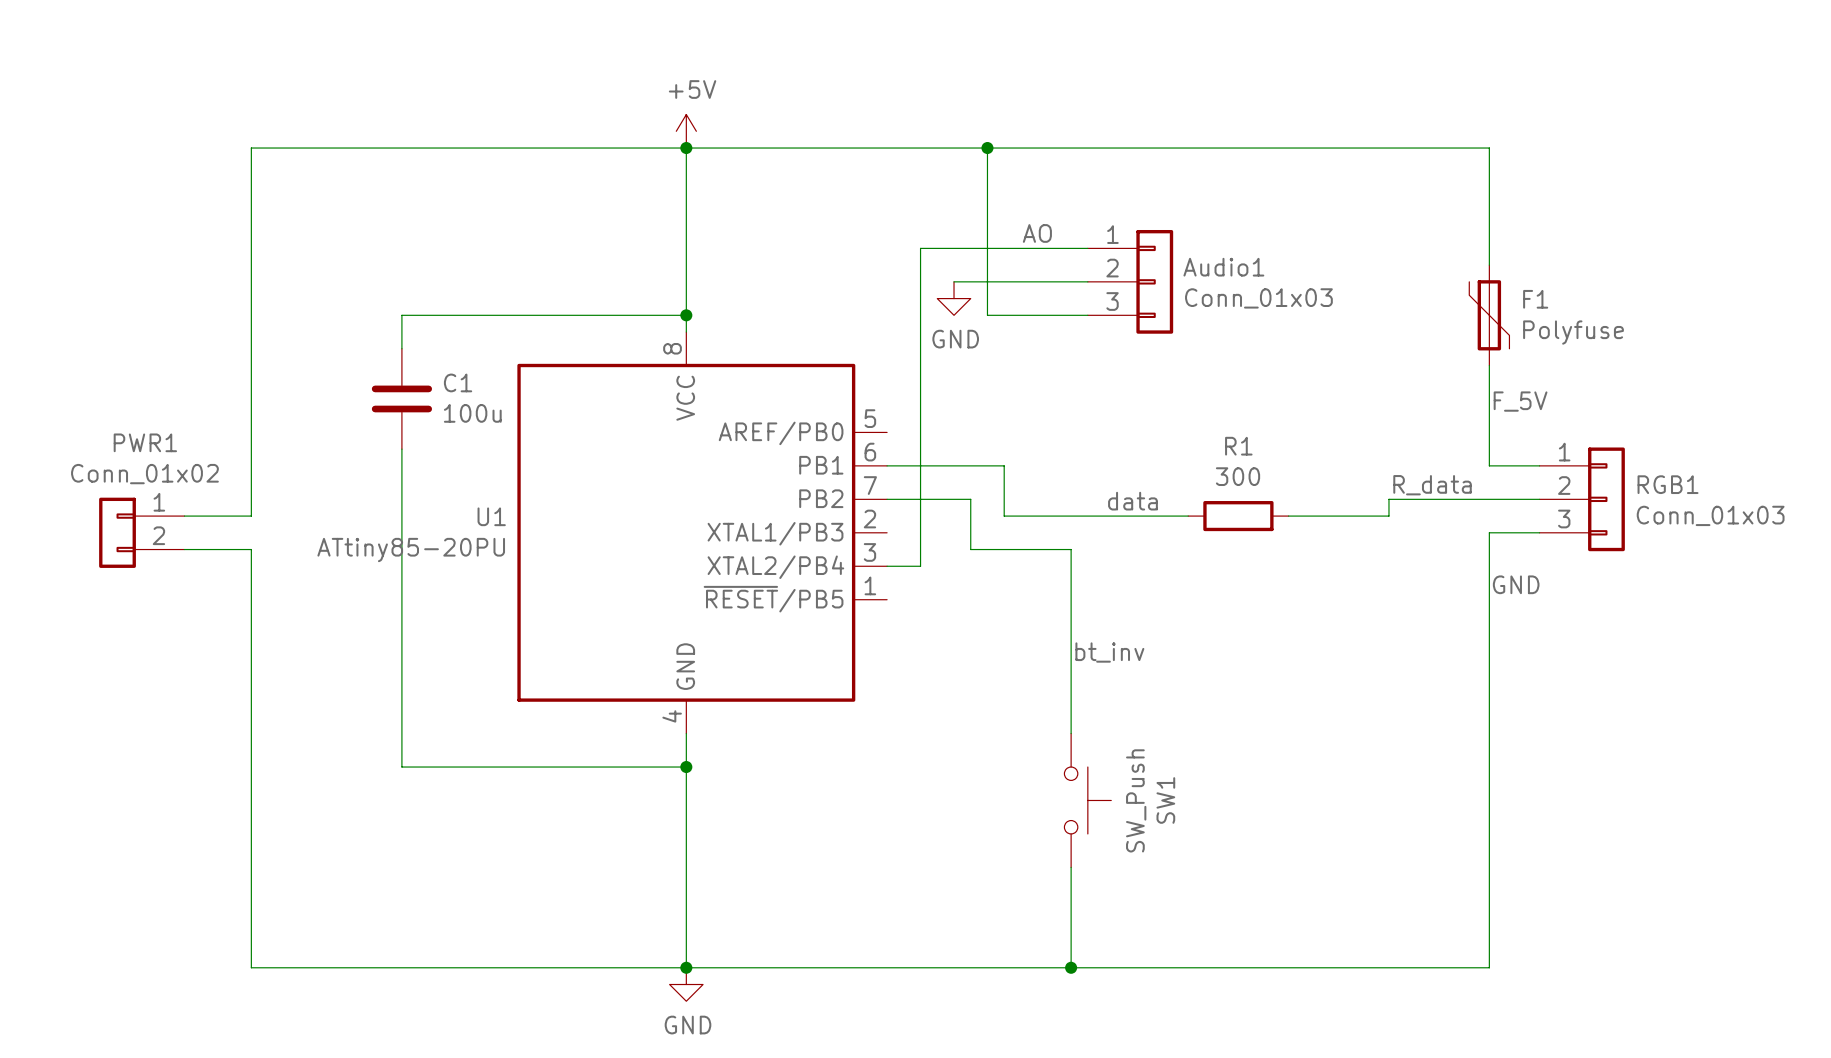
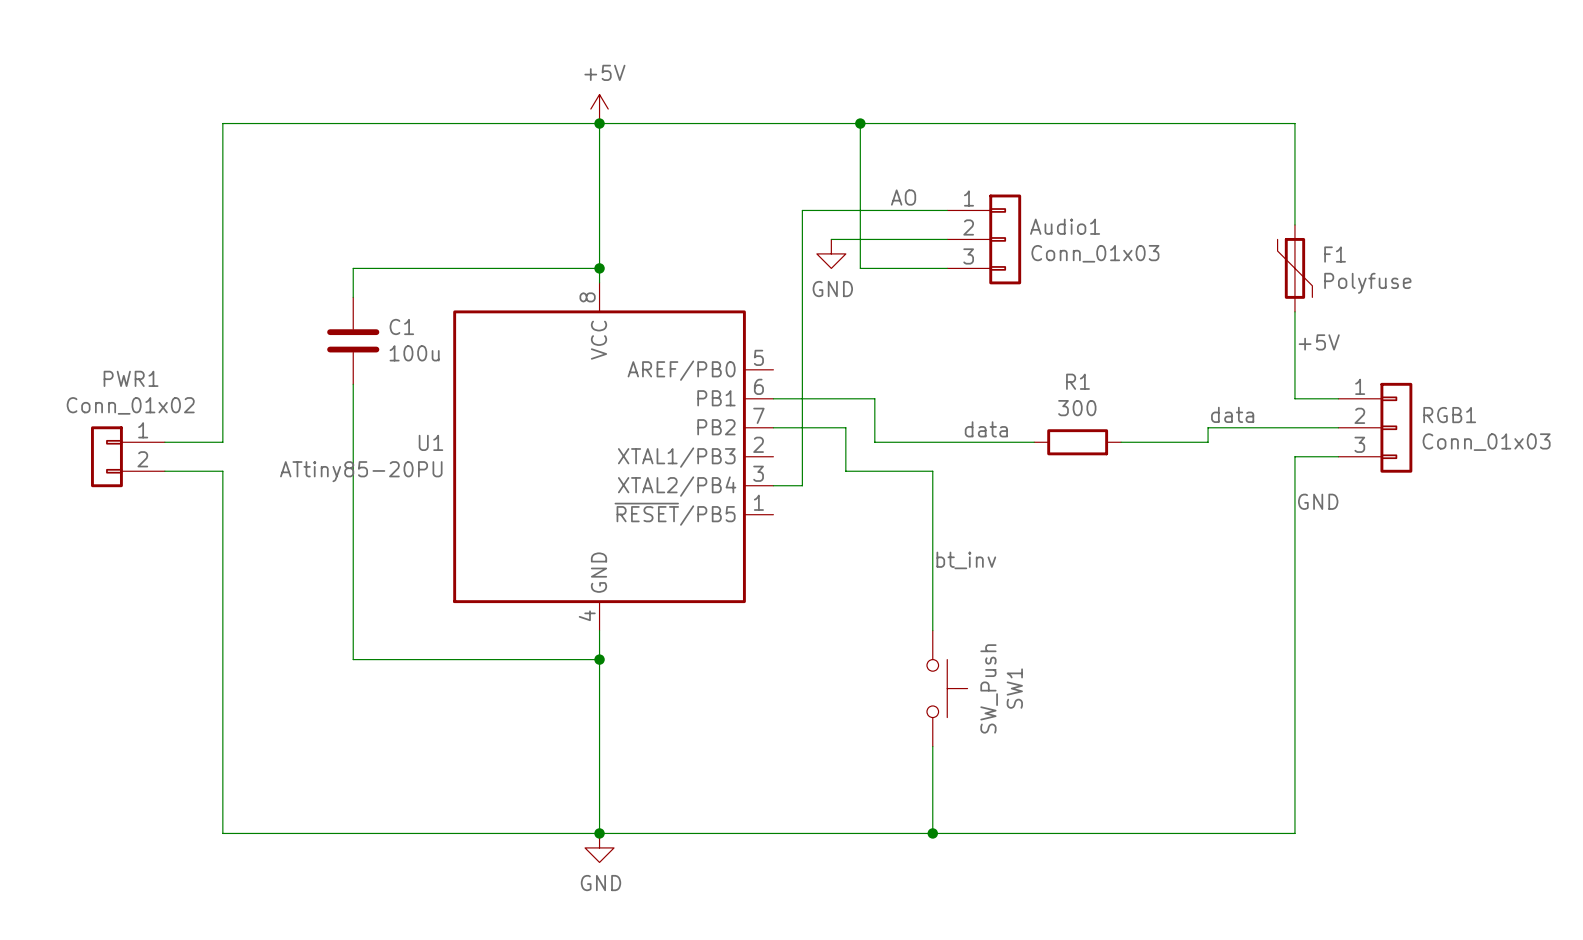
label: F_5V (1520, 401) -> +5V (1319, 342)
label: R_data (1432, 485) -> data (1232, 414)

